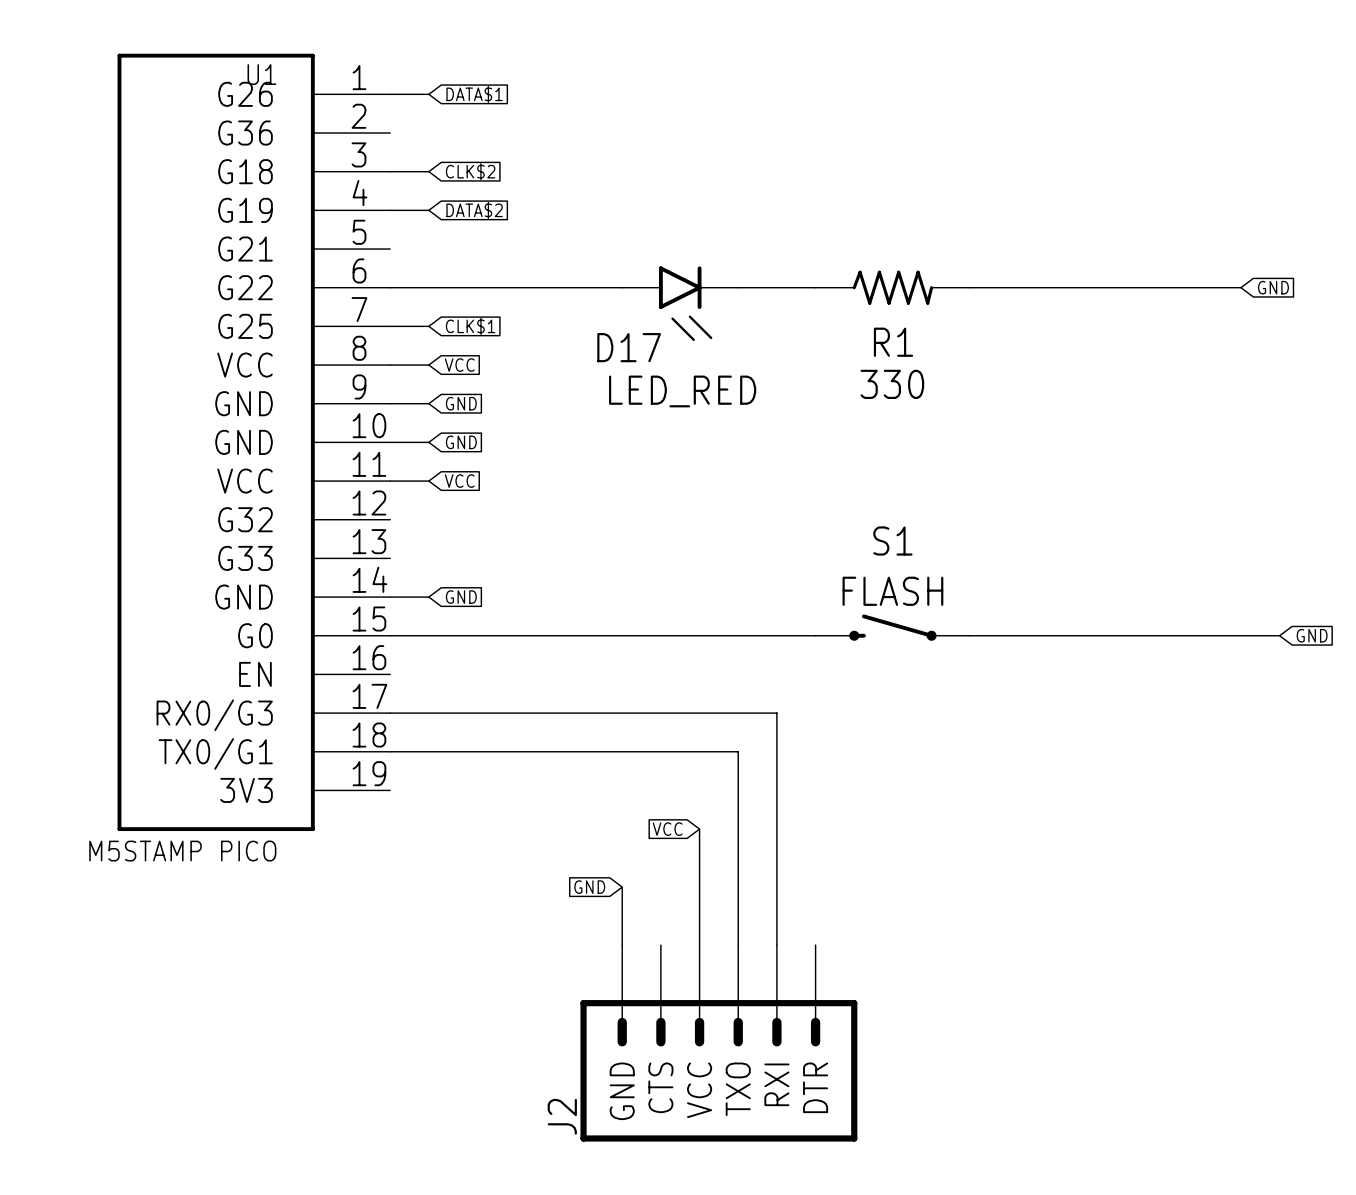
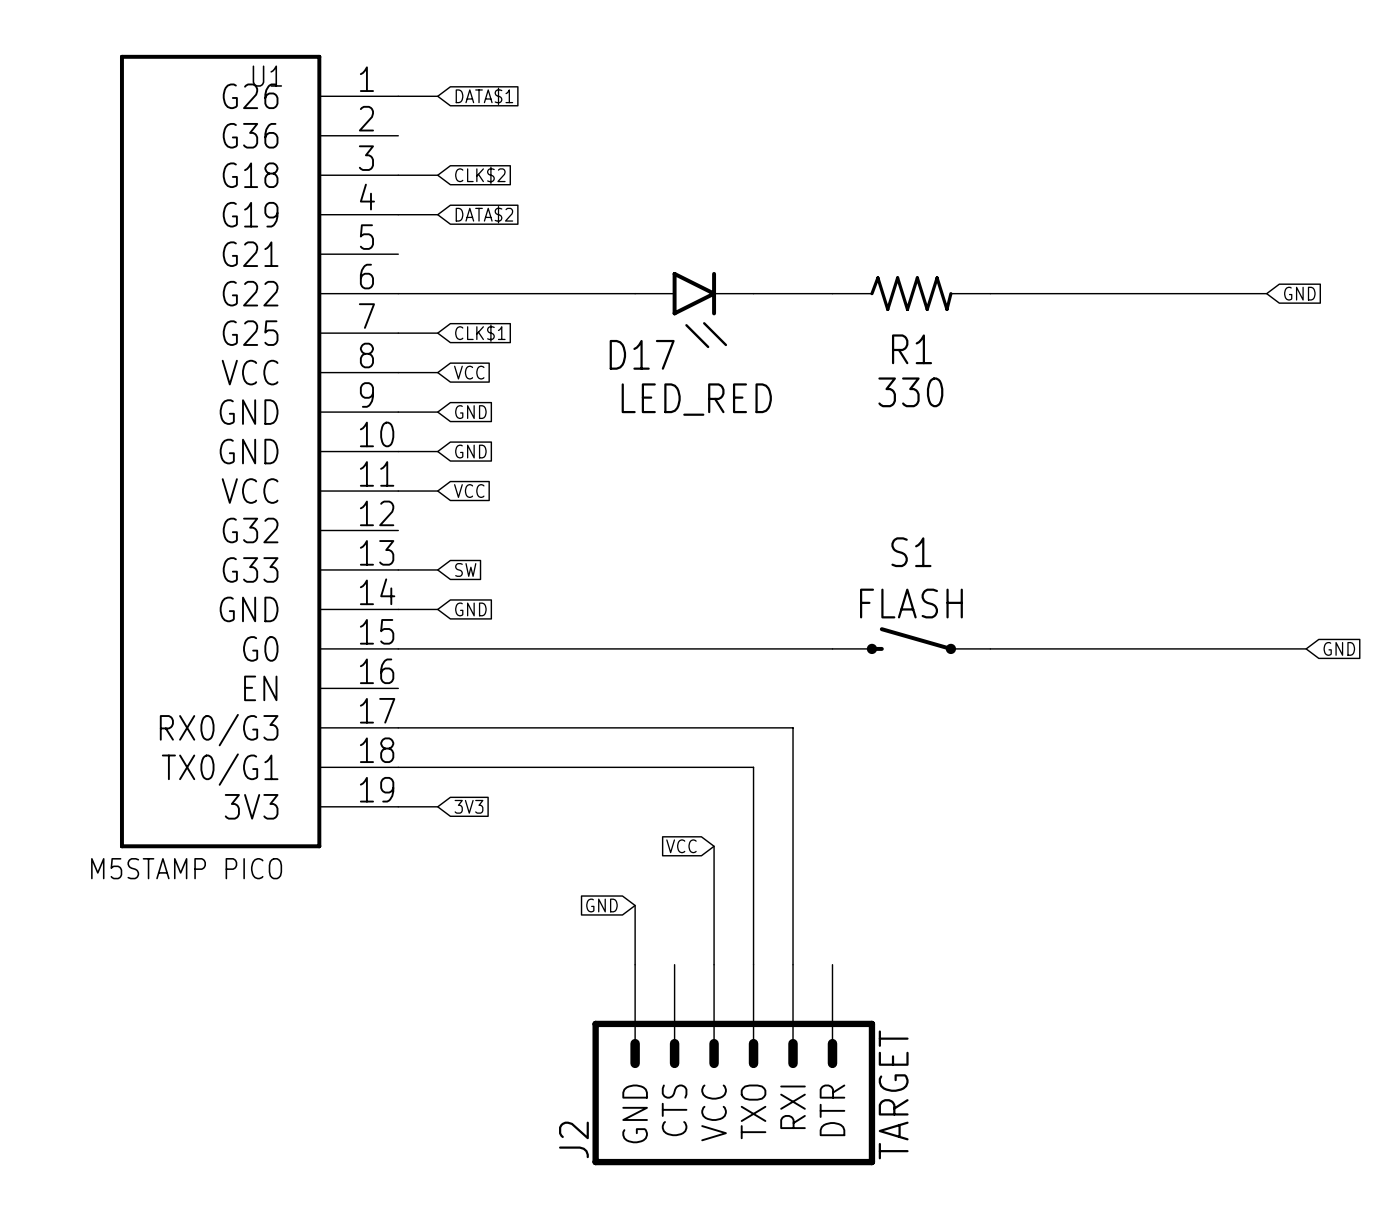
wire: none -> (398, 569) (437, 569)
global label: none -> SW (465, 569)
wire: none -> (398, 806) (437, 806)
global label: none -> 3V3 (469, 806)
J2 value: none -> TARGET (893, 1094)

